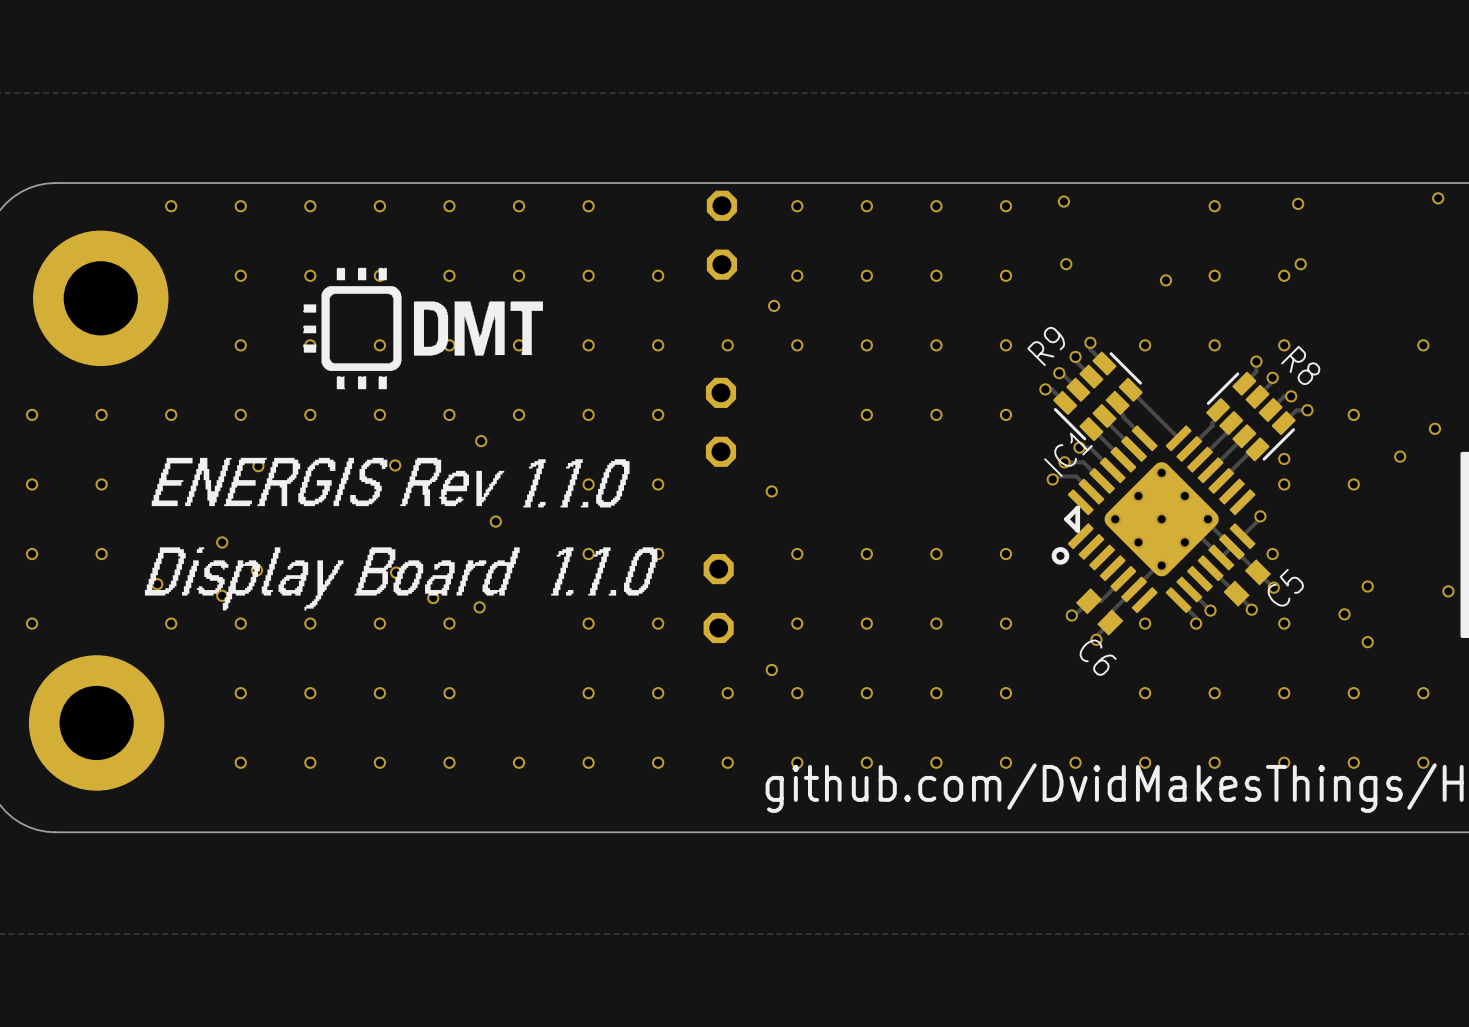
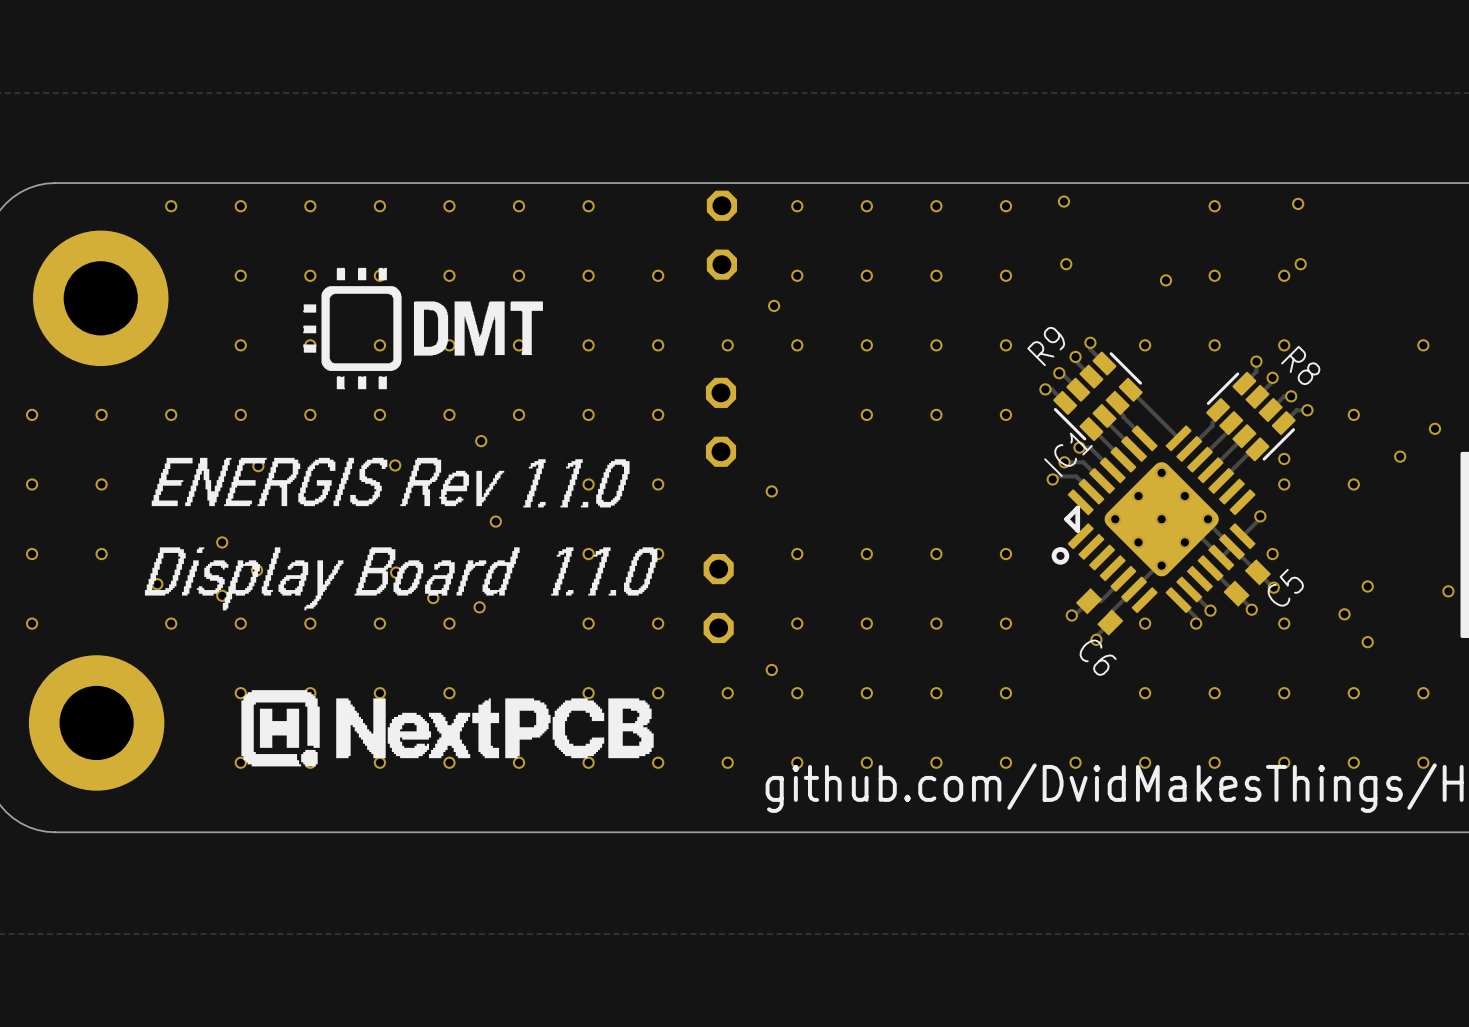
via: (1438, 198) -> none
drawing: none -> [241, 690, 654, 767]

